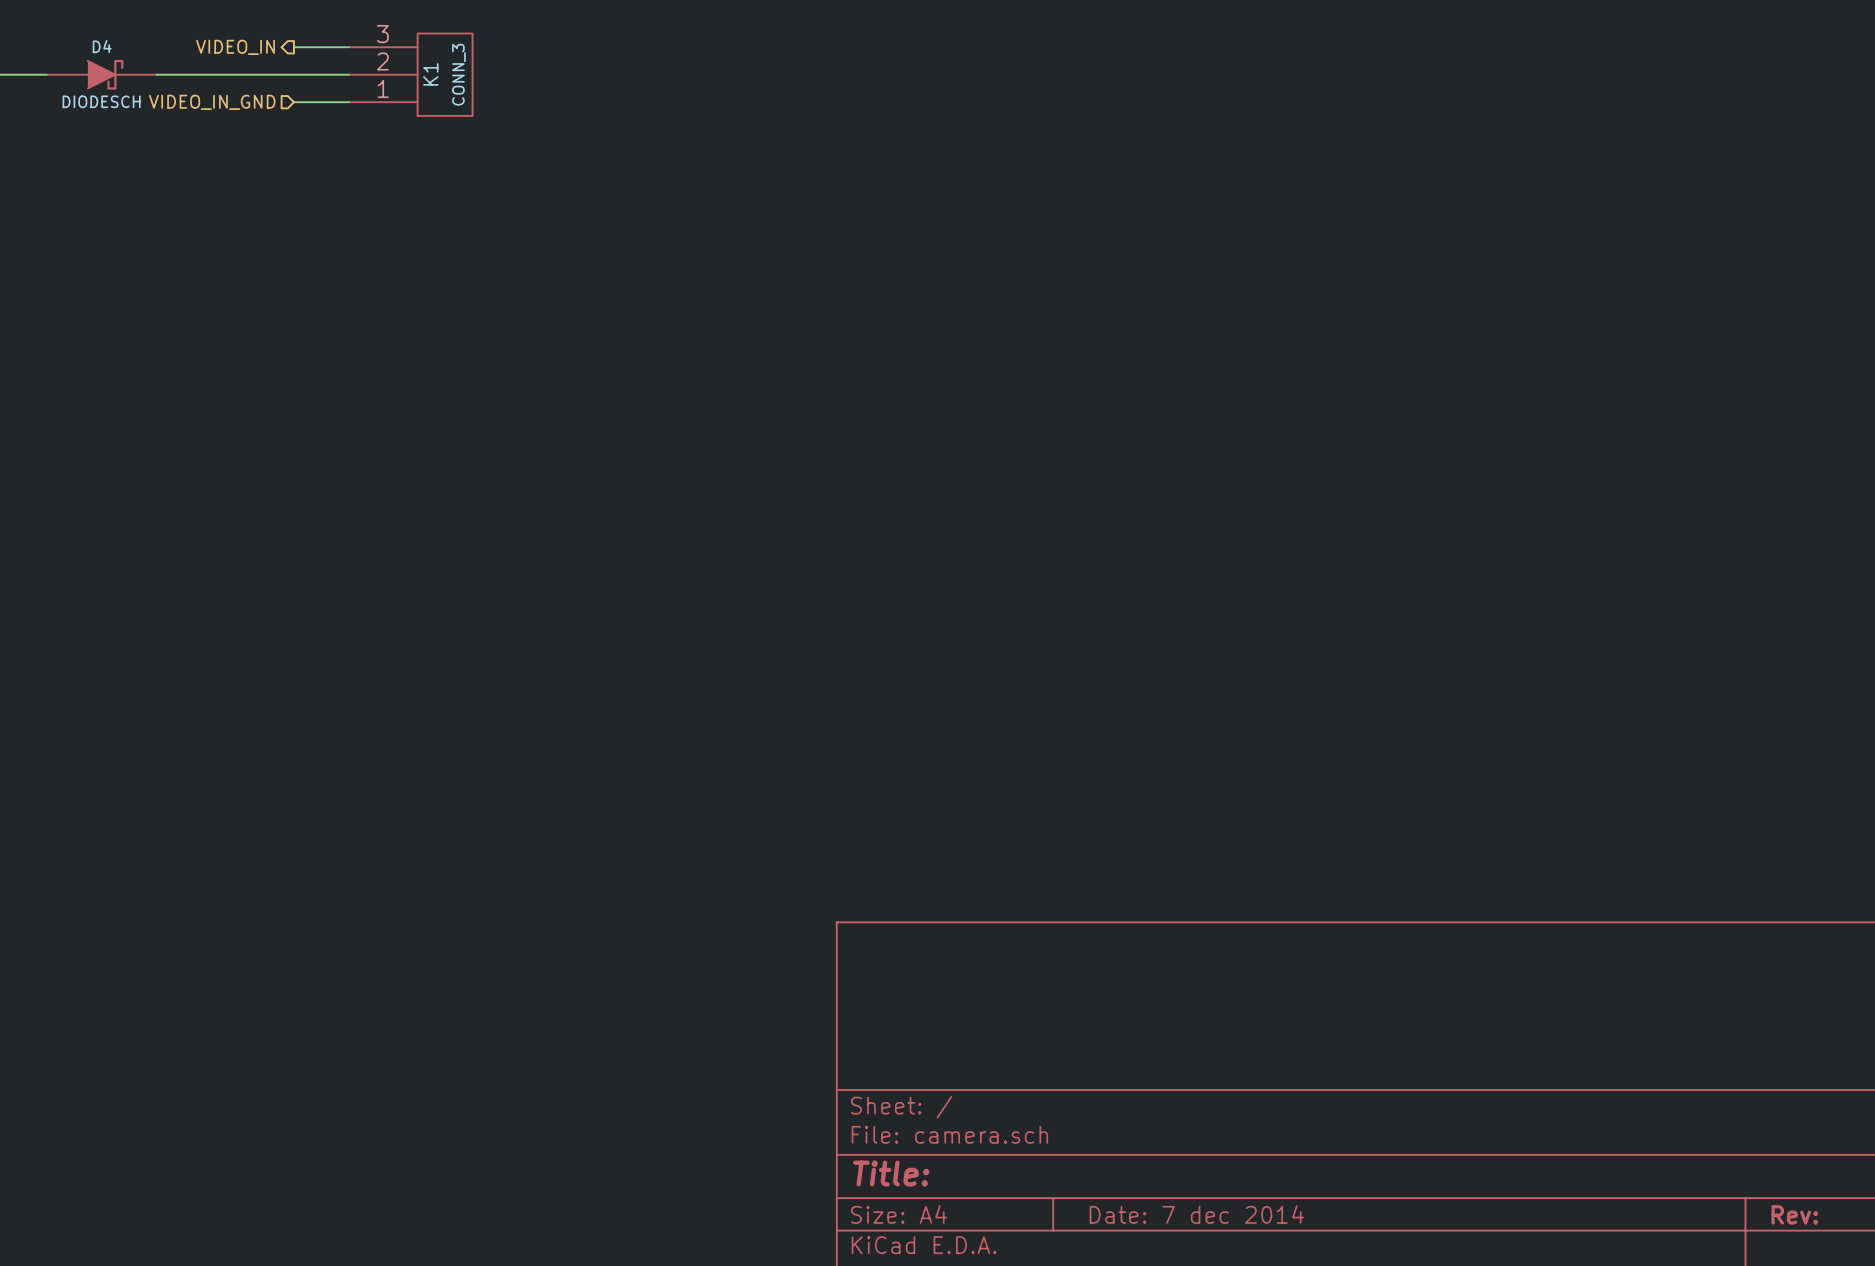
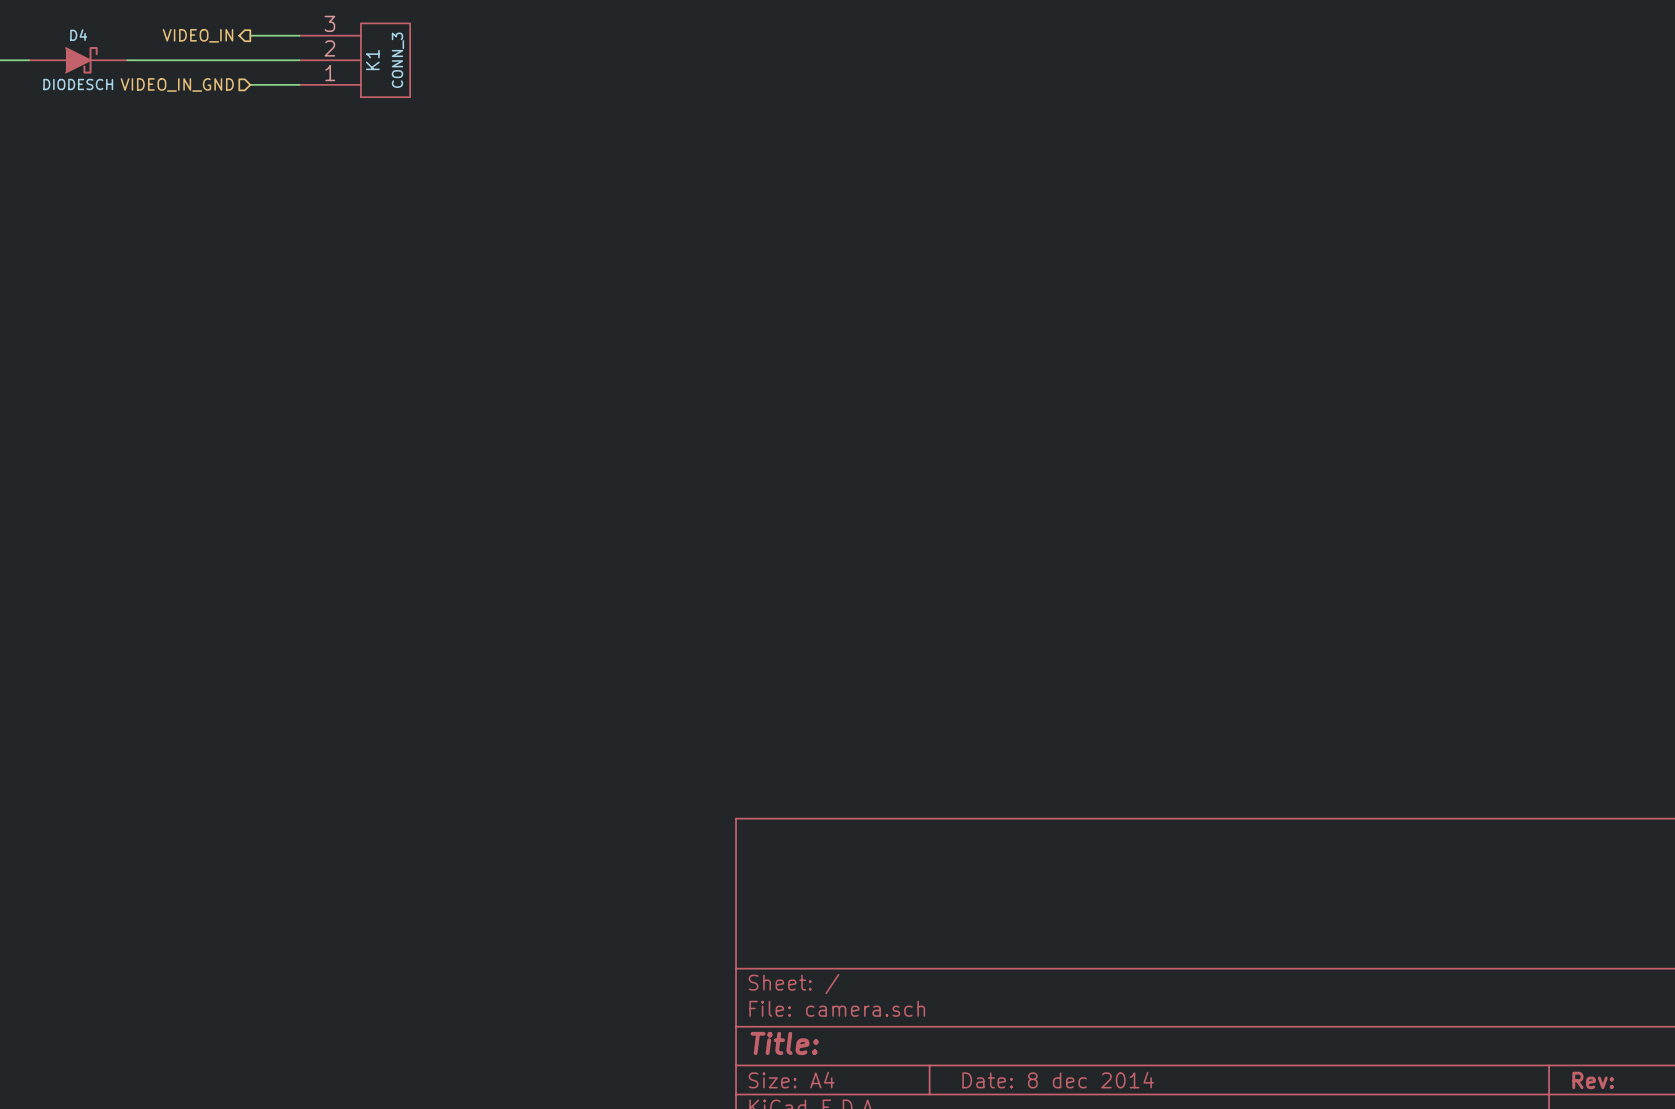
title block: Date: 7 dec 2014 (1196, 1214) -> Date: 8 dec 2014 (1058, 1080)

